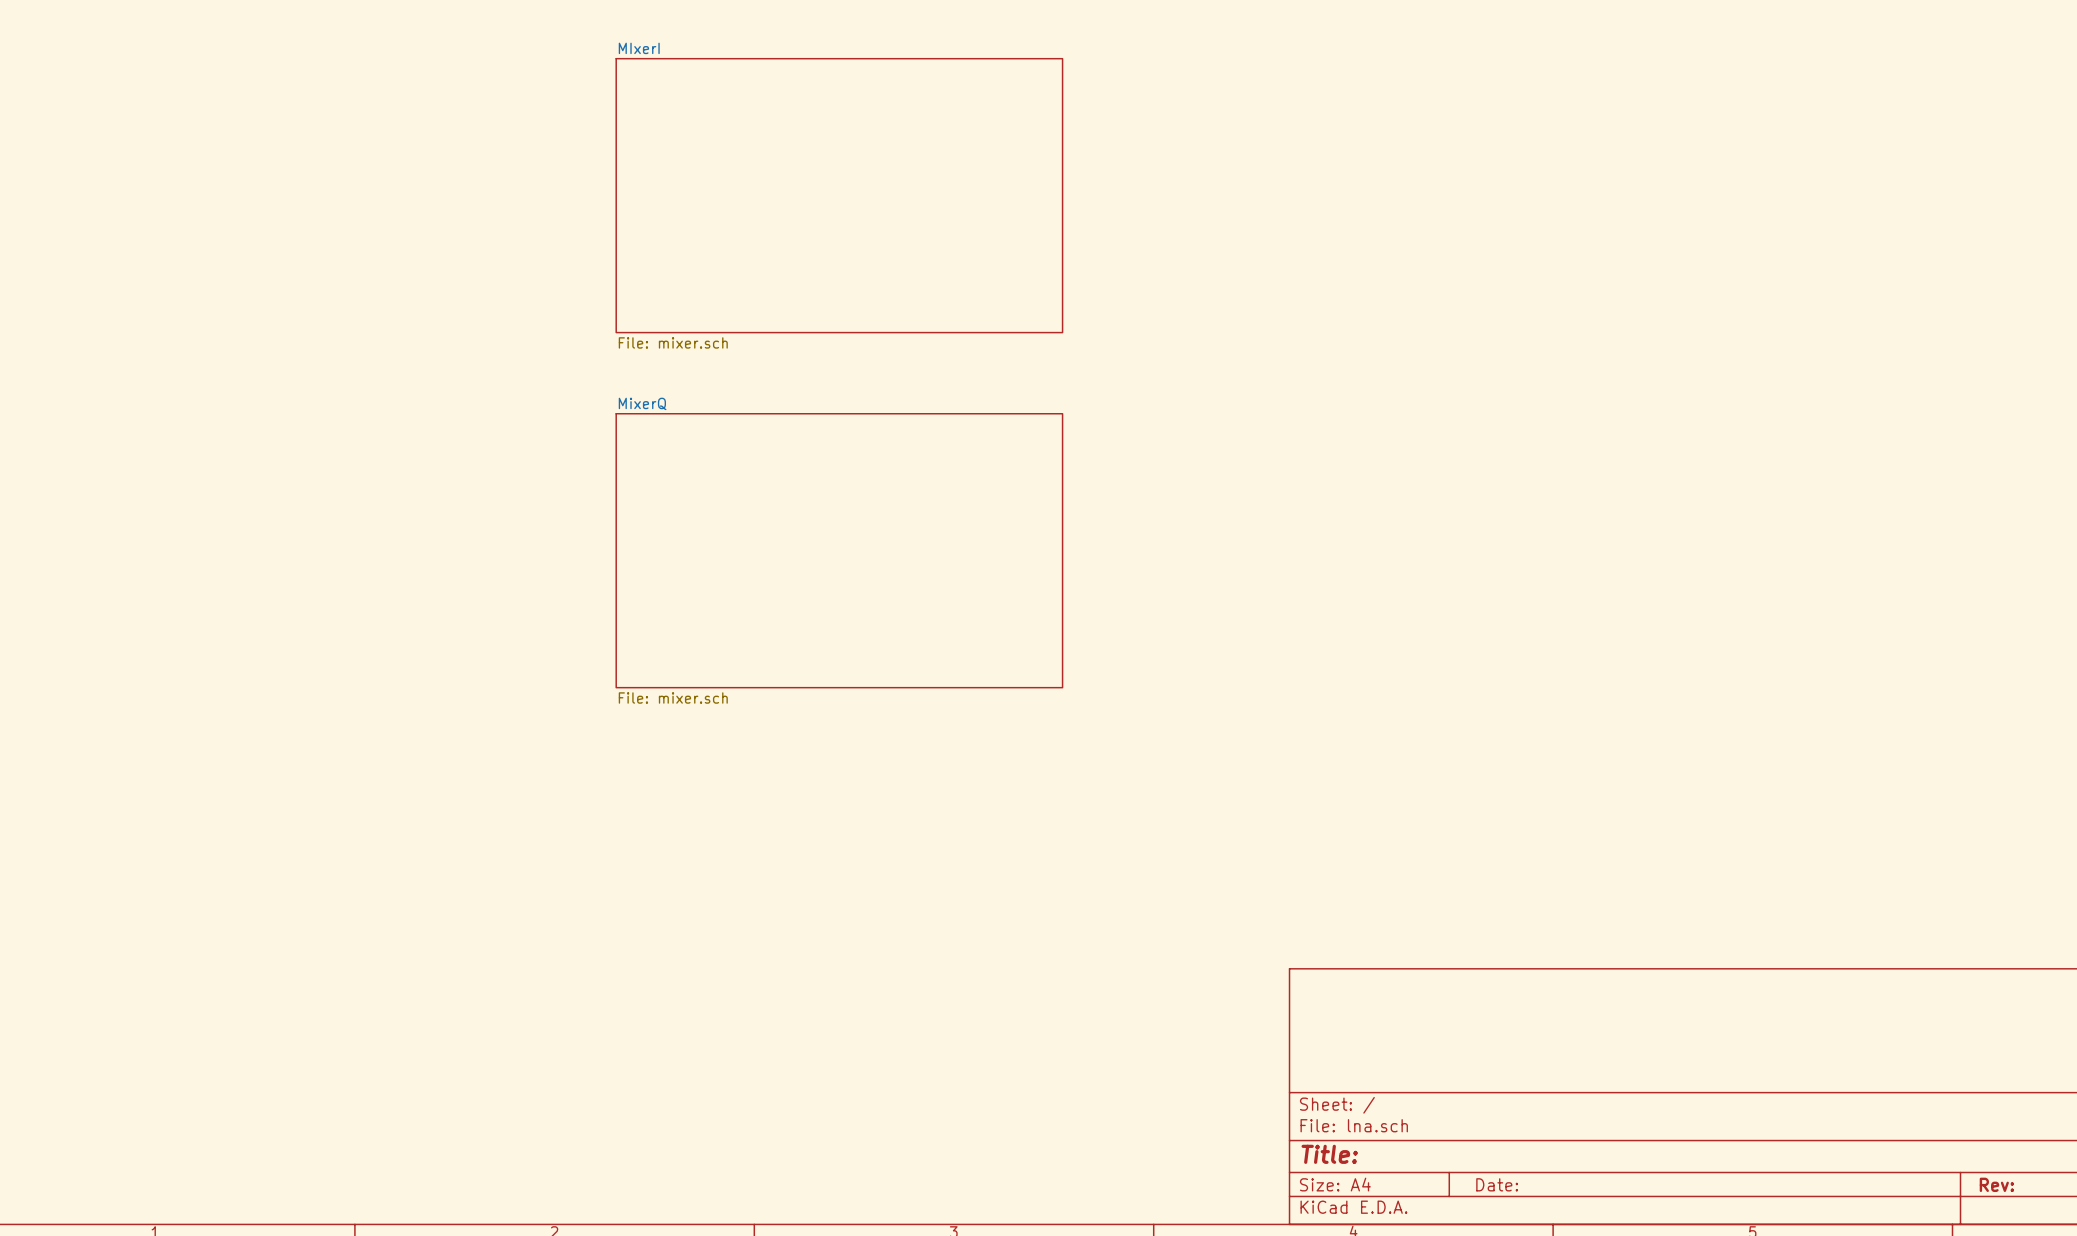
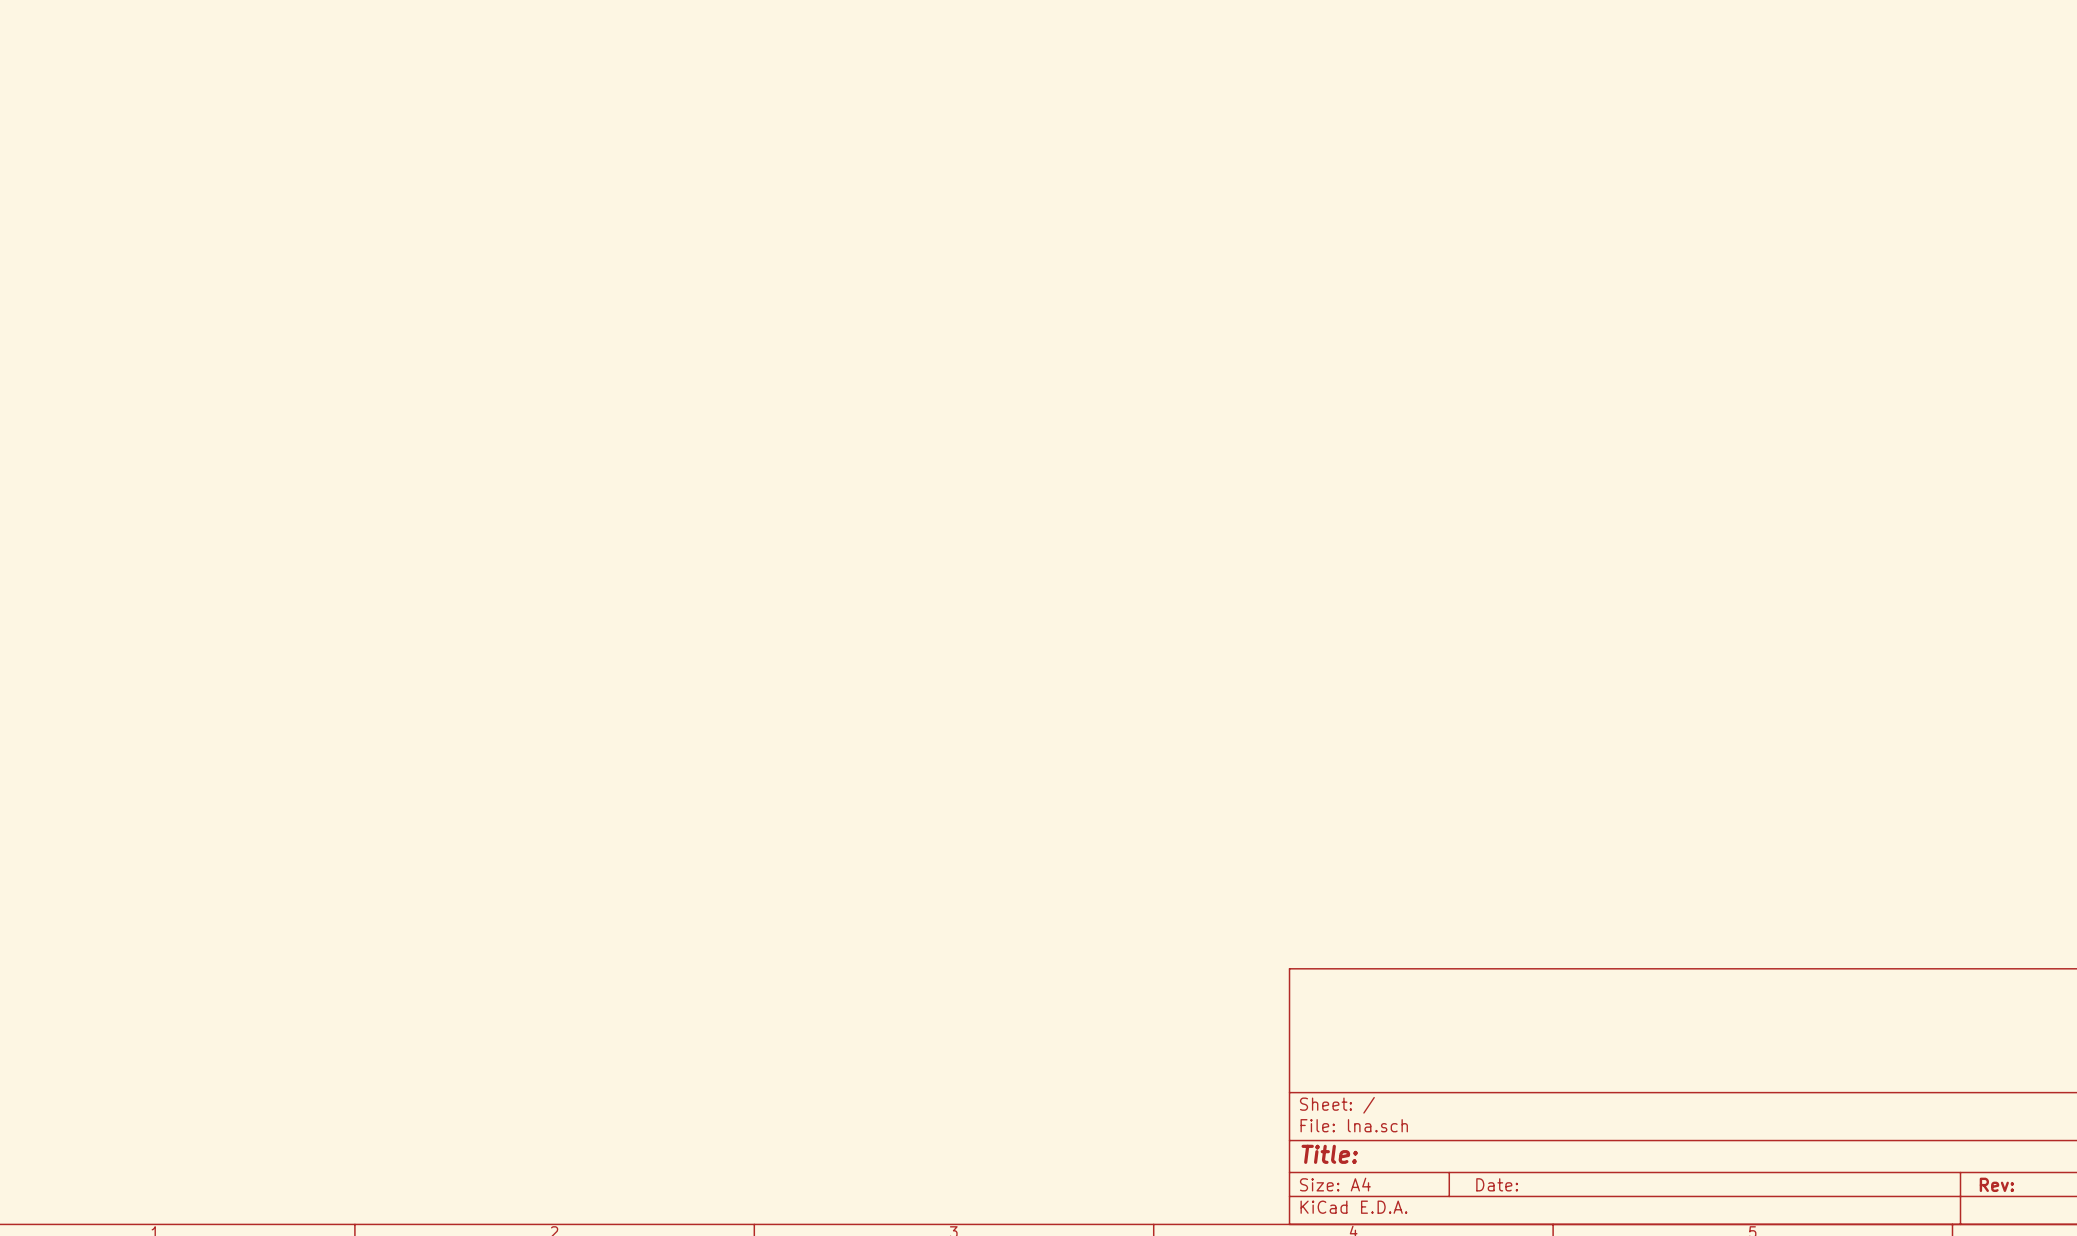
sheet MIxerI: File: mixer.sch (839, 195) -> none
sheet MixerQ: File: mixer.sch (839, 550) -> none

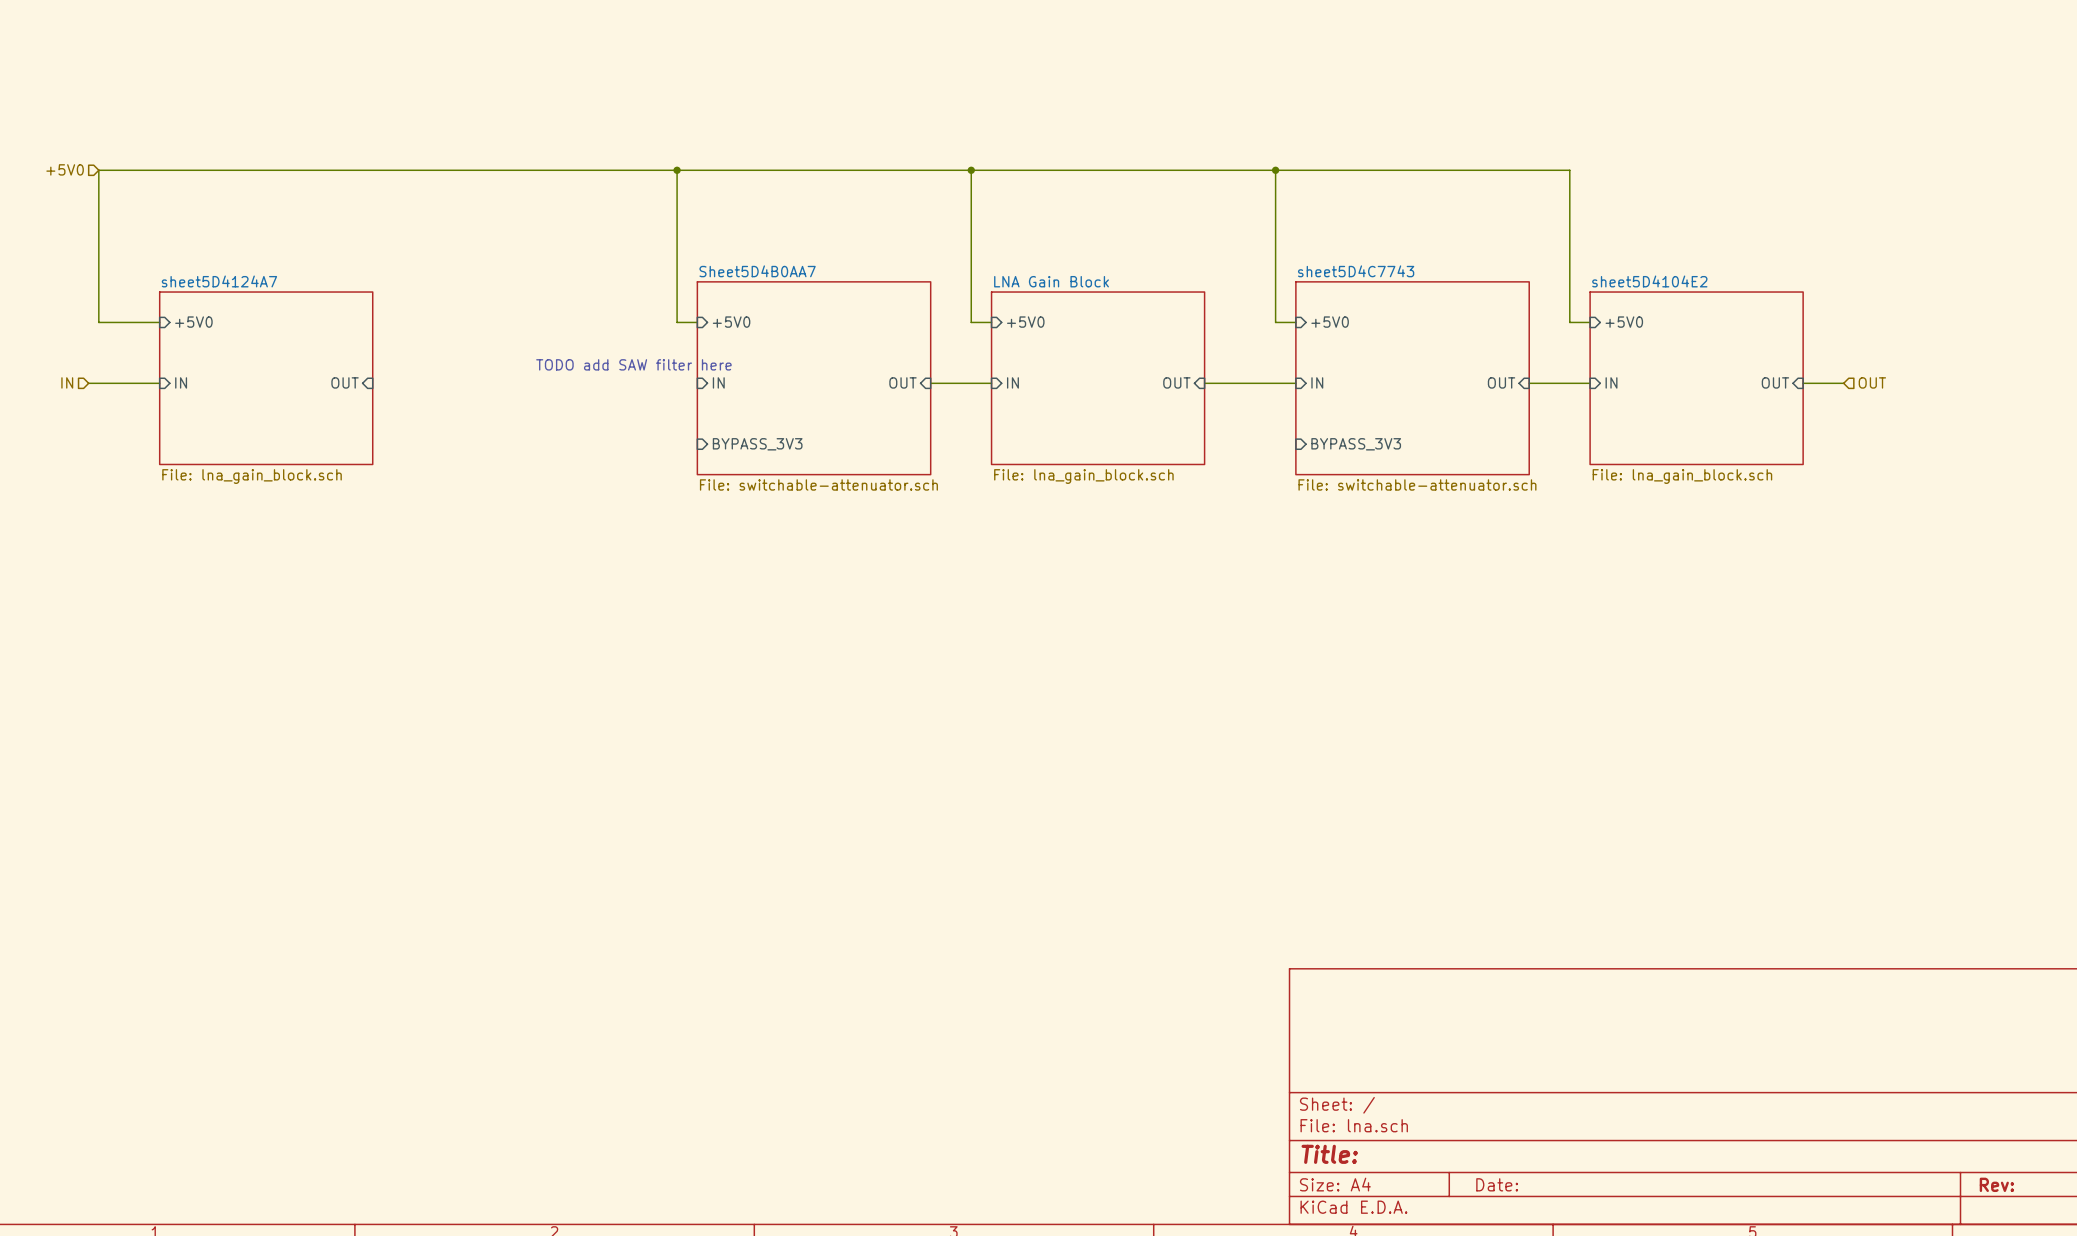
hierarchical label: none -> +5V0 (65, 169)
wire: none -> (677, 170) (677, 322) (697, 322)
junction: none -> (677, 170)
wire: none -> (971, 170) (971, 322) (991, 322)
junction: none -> (971, 170)
wire: none -> (1275, 170) (1275, 322) (1295, 322)
junction: none -> (1275, 170)
wire: none -> (159, 322) (98, 322) (98, 170) (1569, 170) (1569, 322) (1590, 322)
sheet pin: none -> +5V0 (193, 322)
sheet pin: none -> +5V0 (731, 322)
sheet pin: none -> +5V0 (1025, 322)
sheet pin: none -> +5V0 (1330, 322)
sheet pin: none -> +5V0 (1624, 322)
text: none -> TODO add SAW filter here (633, 364)
sheet sheet5D4124A7: none -> File: lna_gain_block.sch (266, 378)
sheet Sheet5D4B0AA7: none -> File: switchable-attenuator.sch (814, 378)
sheet LNA Gain Block: none -> File: lna_gain_block.sch (1098, 378)
sheet sheet5D4C7743: none -> File: switchable-attenuator.sch (1412, 378)
sheet sheet5D4104E2: none -> File: lna_gain_block.sch (1696, 378)
hierarchical label: none -> IN (67, 382)
sheet pin: none -> IN (181, 382)
sheet pin: none -> OUT (345, 382)
sheet pin: none -> IN (718, 382)
sheet pin: none -> OUT (902, 382)
sheet pin: none -> IN (1012, 382)
sheet pin: none -> OUT (1176, 382)
sheet pin: none -> IN (1317, 382)
sheet pin: none -> OUT (1501, 382)
sheet pin: none -> IN (1611, 382)
sheet pin: none -> OUT (1775, 382)
hierarchical label: none -> OUT (1872, 382)
wire: none -> (88, 383) (159, 383)
wire: none -> (930, 383) (991, 383)
wire: none -> (1204, 383) (1295, 383)
wire: none -> (1529, 383) (1590, 383)
wire: none -> (1803, 383) (1843, 383)
sheet pin: none -> BYPASS_3V3 (757, 444)
sheet pin: none -> BYPASS_3V3 (1356, 444)

